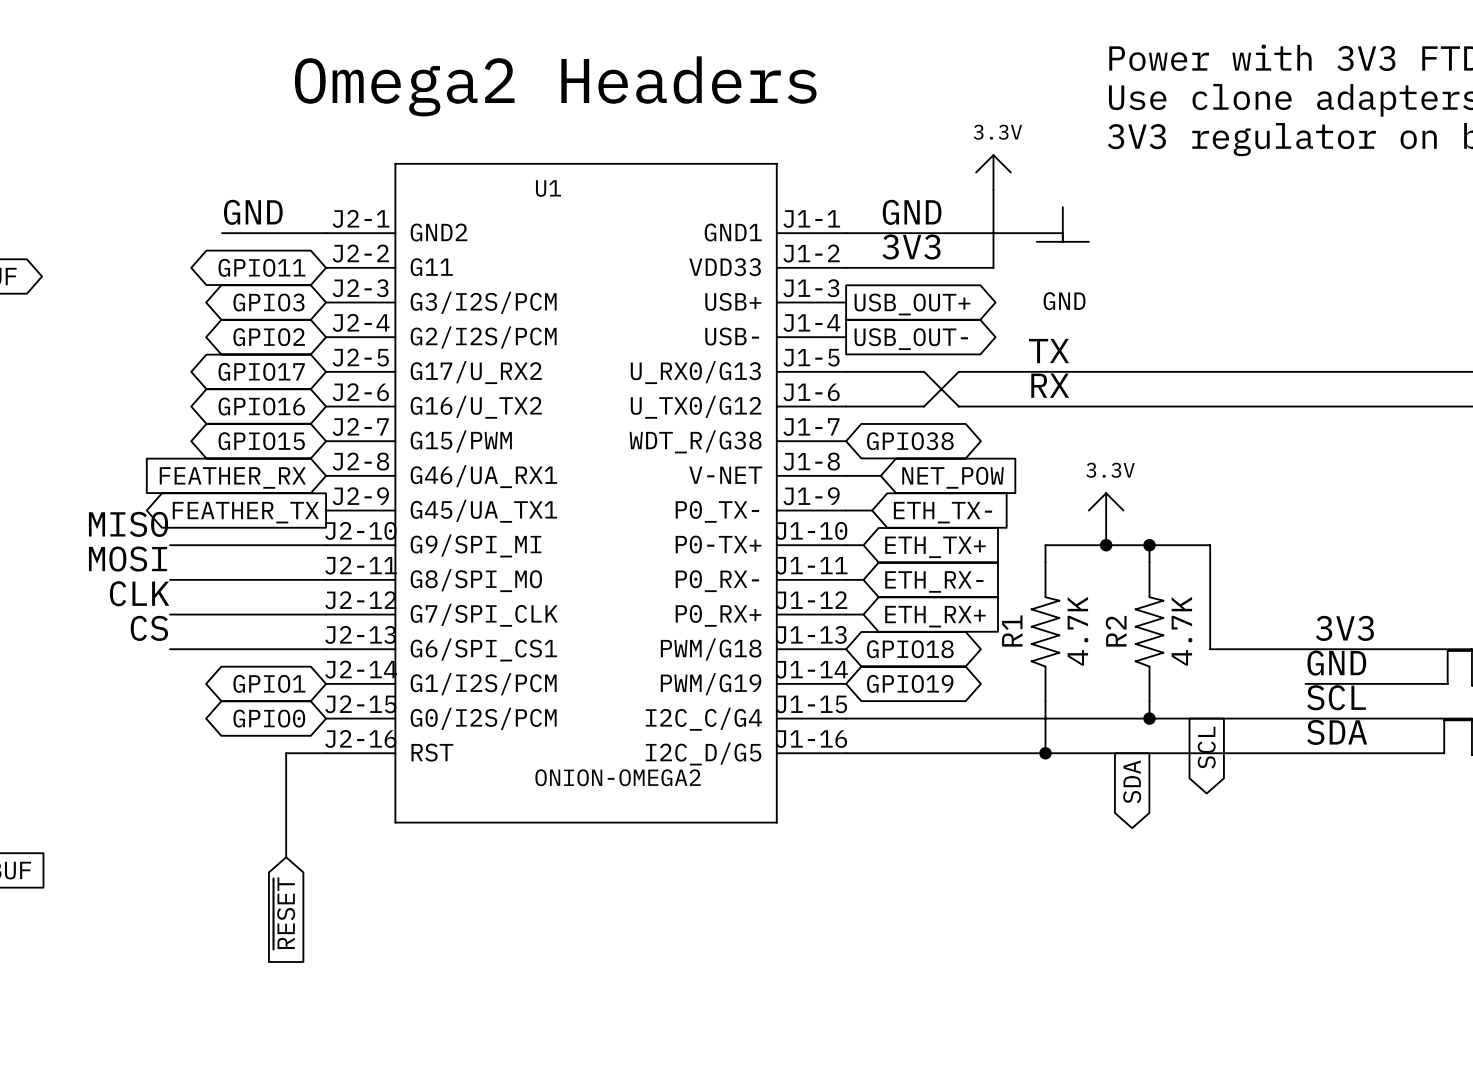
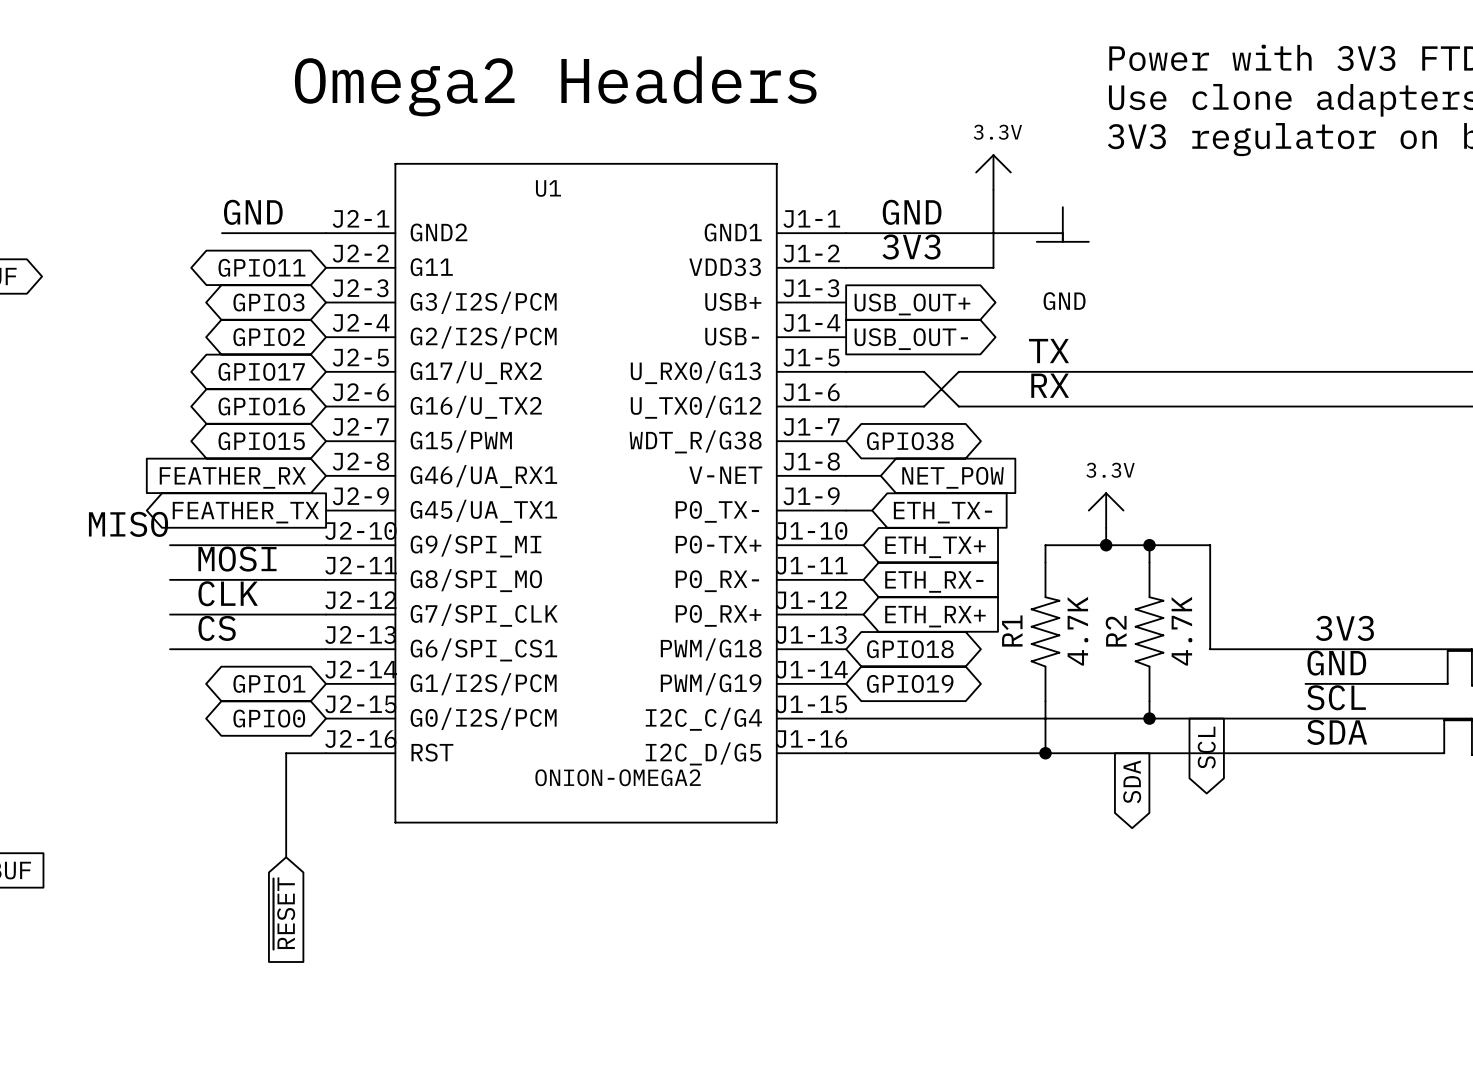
label position: MOSI (128, 559) -> MOSI (237, 559)
label position: CLK (139, 593) -> CLK (228, 593)
label position: CS (149, 628) -> CS (217, 628)

